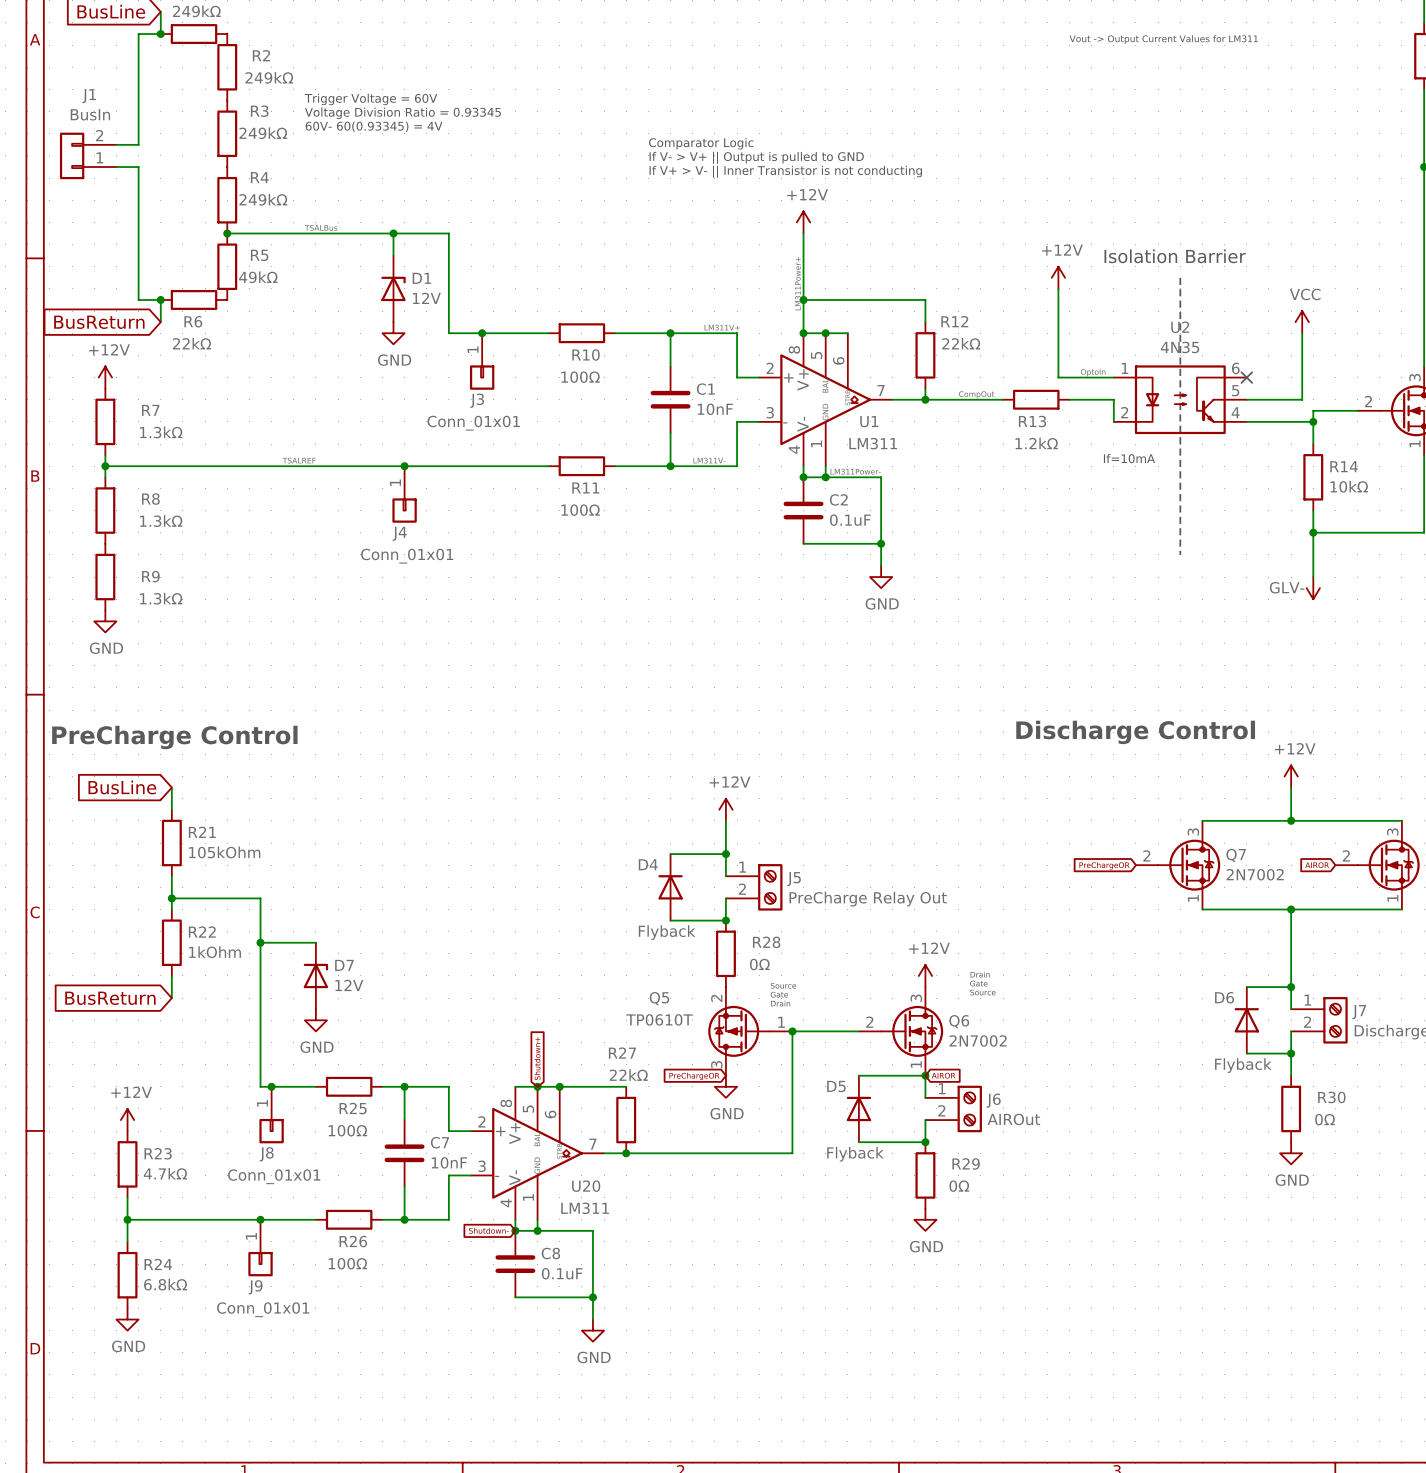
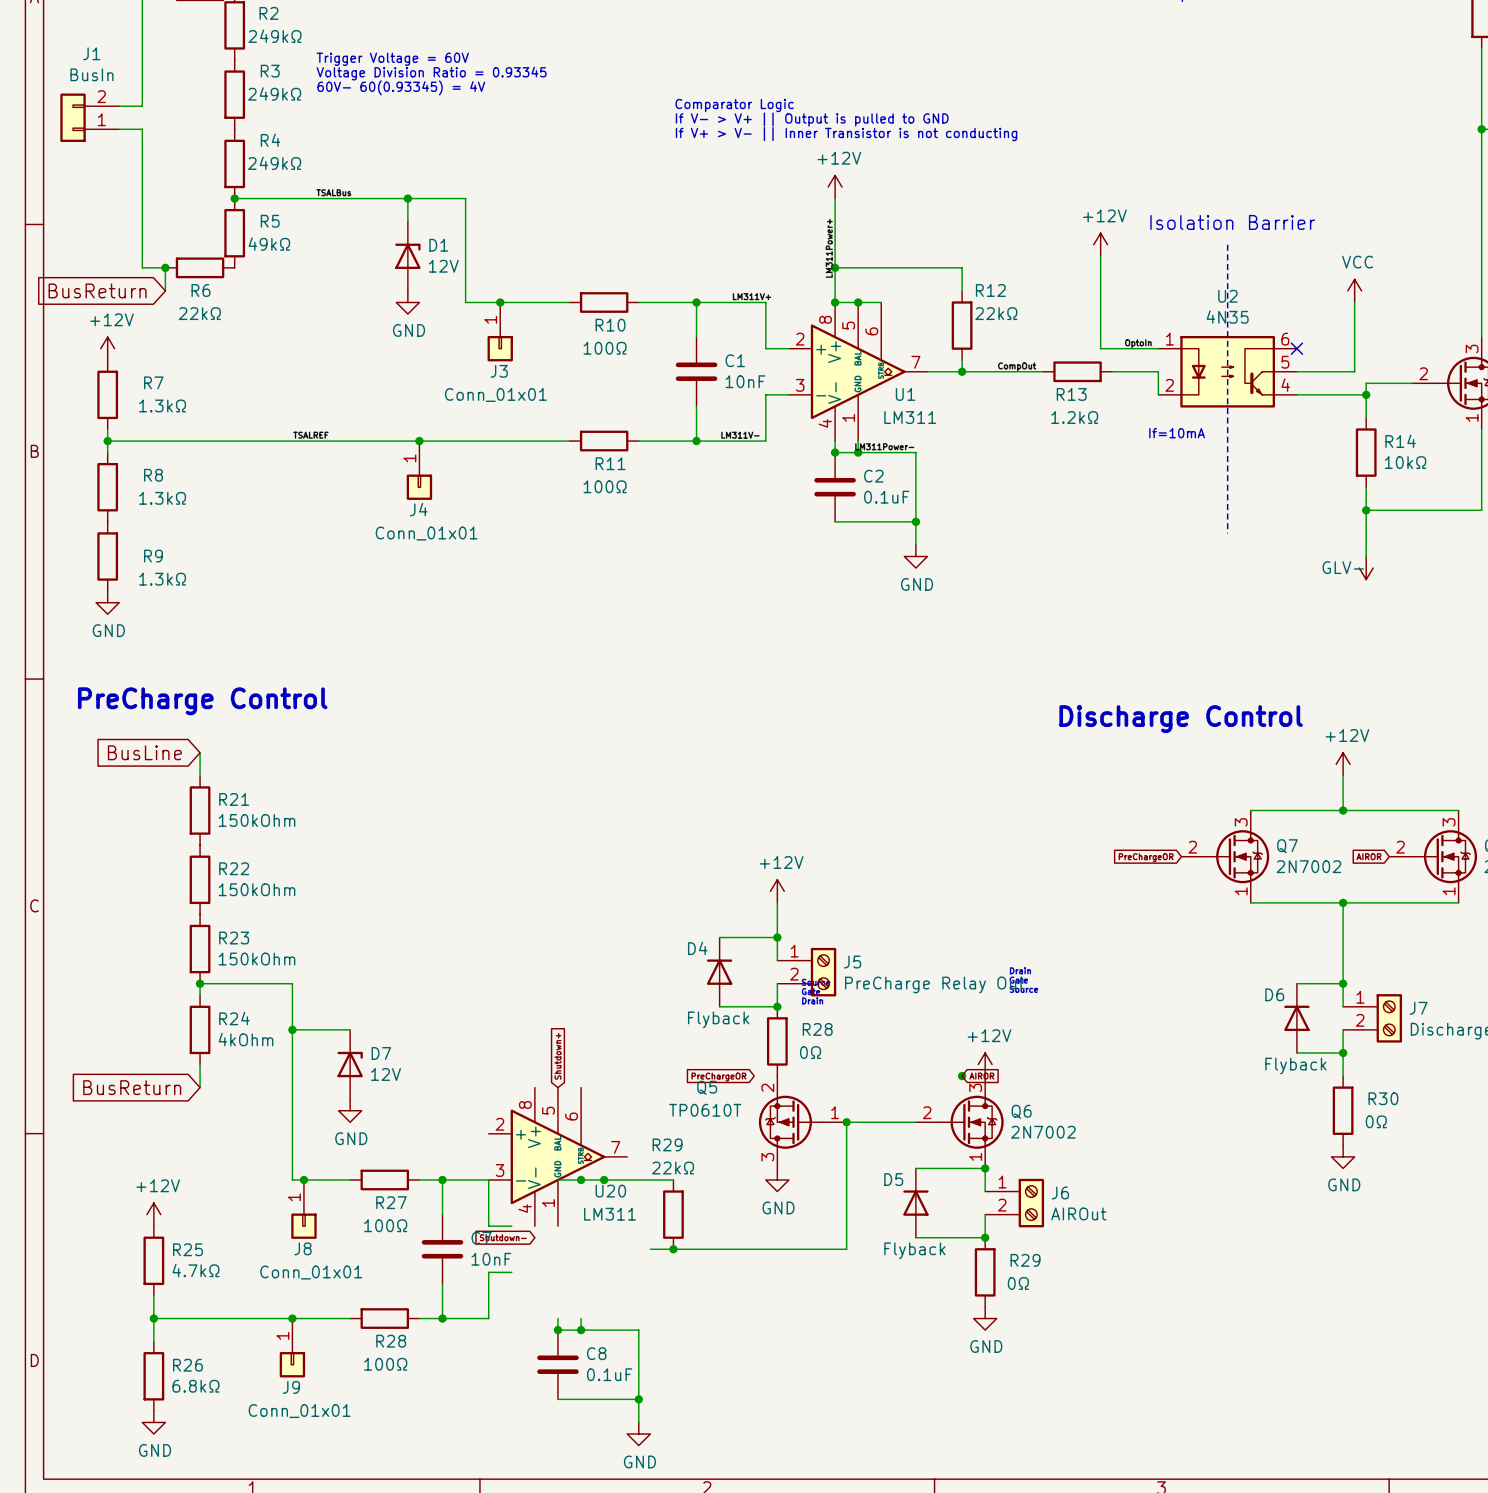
text position: PreCharge Control (174, 737) -> PreCharge Control (202, 701)
global label position: BusLine (122, 787) -> BusLine (144, 752)
wire: (171, 787) (171, 809) -> (200, 752) (200, 775)
power symbol position: +12V (725, 809) -> +12V (777, 891)
wire: (725, 820) (725, 876) -> (777, 902) (777, 960)
R21 position: (171, 843) -> (200, 810)
R21 value: 105kOhm (224, 852) -> 150kOhm (256, 820)
wire: (670, 854) (725, 854) -> (719, 937) (777, 937)
junction: (725, 854) -> none
wire: (171, 876) (171, 909) -> none
D4 position: (670, 887) -> (719, 972)
J5 position: (754, 887) -> (806, 972)
wire: (171, 898) (260, 898) (260, 1086) (315, 1086) -> none
junction: (171, 898) -> none
wire: (725, 898) (725, 920) (670, 920) -> (777, 983) (777, 1006) (719, 1006)
junction position: (725, 920) -> (777, 937)
R22 position: (171, 942) -> (200, 879)
wire: (260, 942) (315, 942) -> (292, 1029) (350, 1029)
junction: (260, 942) -> none
R22 value: 1kOhm (215, 952) -> 150kOhm (256, 889)
R28 position: (725, 953) -> (777, 1041)
wire: (171, 975) (171, 998) -> (200, 1064) (200, 1087)
D7 position: (315, 975) -> (350, 1064)
power symbol position: +12V (925, 975) -> +12V (985, 1064)
junction: none -> (200, 983)
global label position: BusReturn (110, 998) -> BusReturn (132, 1087)
wire: none -> (200, 995) (200, 983) (292, 983) (292, 1179) (350, 1179)
junction: none -> (777, 1006)
power symbol position: GND (315, 1020) -> GND (350, 1110)
junction: none -> (292, 1029)
Q5 position: (750, 1031) -> (802, 1122)
junction: (792, 1031) -> none
wire: (858, 1031) (792, 1031) (792, 1153) (604, 1153) -> (915, 1122) (846, 1122) (846, 1249) (650, 1249)
Q6 position: (901, 1031) -> (959, 1122)
R27 name position: R27 (622, 1053) -> R27 (391, 1202)
R27 value: 22kΩ (628, 1075) -> 100Ω (385, 1225)
wire: (858, 1075) (925, 1075) (925, 1097) -> (915, 1168) (985, 1168) (985, 1191)
junction: (271, 1086) -> none
R25 rotation: 0° (349, 1086) -> 90° clockwise (153, 1260)
R25 position: (349, 1086) -> (153, 1260)
wire: (382, 1086) (448, 1086) (448, 1131) (471, 1131) -> none
wire: (404, 1086) (404, 1120) -> (442, 1179) (442, 1214)
junction: (404, 1086) -> none
wire: (515, 1086) (626, 1086) -> (557, 1179) (673, 1179)
junction: (537, 1086) -> none
junction: (559, 1086) -> none
power symbol: GND (725, 1086) -> none
R25 name position: R25 (353, 1108) -> R25 (187, 1249)
D5 position: (858, 1108) -> (915, 1203)
J6 position: (953, 1108) -> (1014, 1203)
J8 position: (271, 1115) -> (303, 1209)
power symbol position: +12V (127, 1120) -> +12V (153, 1214)
R27 rotation: 0° (626, 1120) -> 90° clockwise (384, 1179)
R27 position: (626, 1120) -> (384, 1179)
junction: none -> (846, 1122)
wire: (925, 1120) (925, 1142) (858, 1142) -> (985, 1214) (985, 1237) (915, 1237)
R25 value: 100Ω (347, 1130) -> 4.7kΩ (195, 1270)
junction position: (925, 1142) -> (985, 1168)
C7 position: (404, 1153) -> (442, 1249)
junction: (626, 1153) -> none
R23 position: (127, 1164) -> (200, 949)
R23 value: 4.7kΩ (165, 1173) -> 150kOhm (256, 959)
junction: none -> (303, 1179)
junction: none -> (442, 1179)
wire: (448, 1175) (448, 1219) (382, 1219) -> (465, 1179) (419, 1179)
wire: none -> (488, 1179) (488, 1226) (511, 1226)
junction: none -> (581, 1179)
junction: none -> (604, 1179)
power symbol: none -> GND (777, 1179)
R29 position: (925, 1175) -> (985, 1272)
wire: (404, 1186) (404, 1219) -> (442, 1283) (442, 1318)
wire: (127, 1197) (127, 1241) -> (153, 1295) (153, 1341)
R29: none -> 22kΩ (673, 1214)
wire: (127, 1219) (315, 1219) -> (153, 1318) (350, 1318)
junction: (127, 1219) -> none
junction: (260, 1219) -> none
R26 rotation: 0° (349, 1219) -> 90° clockwise (153, 1376)
R26 position: (349, 1219) -> (153, 1376)
junction: (404, 1219) -> none
wire: (515, 1219) (515, 1230) (592, 1230) (592, 1319) -> (557, 1318) (557, 1330) (638, 1330) (638, 1422)
wire: (537, 1219) (537, 1230) -> (581, 1318) (581, 1330)
power symbol: GND (925, 1219) -> none
junction: (515, 1230) -> none
junction: (537, 1230) -> none
junction: none -> (985, 1237)
R26 name position: R26 (353, 1241) -> R26 (187, 1365)
junction: none -> (673, 1249)
J9 position: (260, 1248) -> (292, 1347)
R26 value: 100Ω (347, 1263) -> 6.8kΩ (195, 1386)
wire: none -> (511, 1272) (488, 1272) (488, 1318) (419, 1318)
C8 position: (515, 1264) -> (557, 1364)
R24 position: (127, 1275) -> (200, 1029)
R24 value: 6.8kΩ (165, 1284) -> 4kOhm (245, 1039)
wire: (515, 1297) (592, 1297) -> (557, 1399) (638, 1399)
junction: (592, 1297) -> none
junction: none -> (153, 1318)
junction: none -> (292, 1318)
R28: none -> 100Ω (384, 1318)
junction: none -> (442, 1318)
power symbol: none -> GND (985, 1318)
power symbol position: GND (127, 1319) -> GND (153, 1422)
junction: none -> (557, 1330)
junction: none -> (581, 1330)
power symbol position: GND (592, 1330) -> GND (638, 1434)
junction: none -> (638, 1399)

